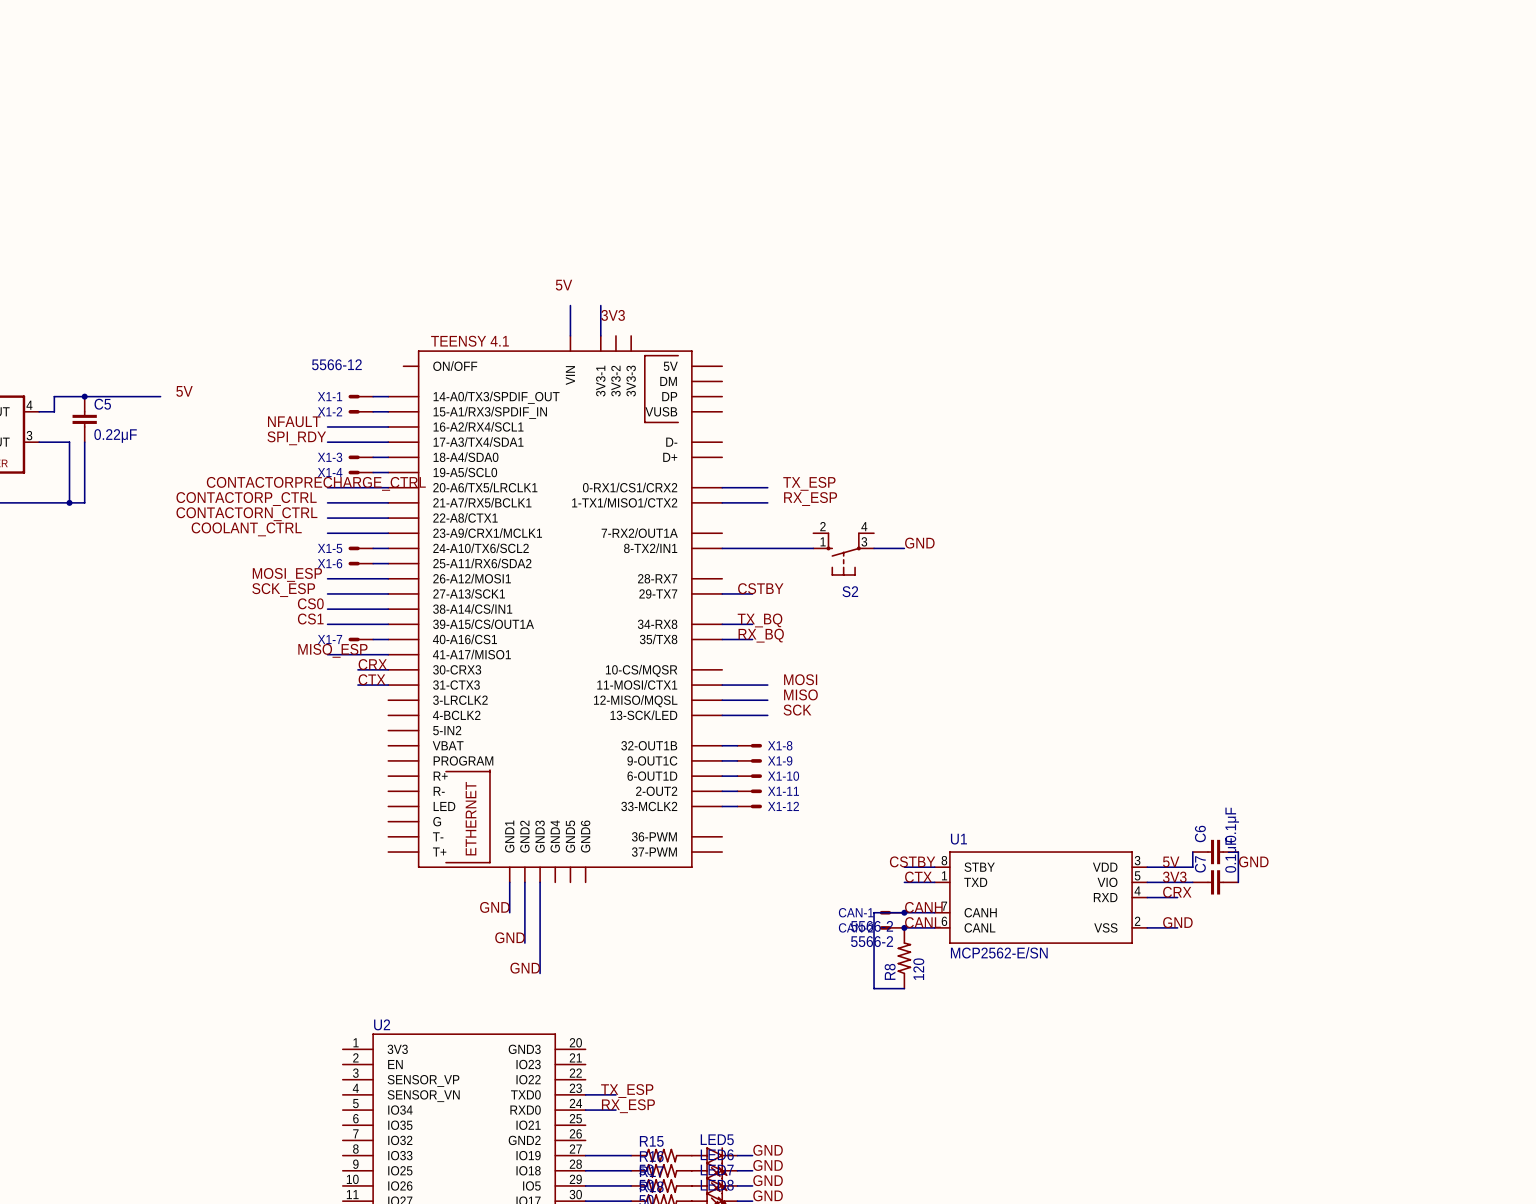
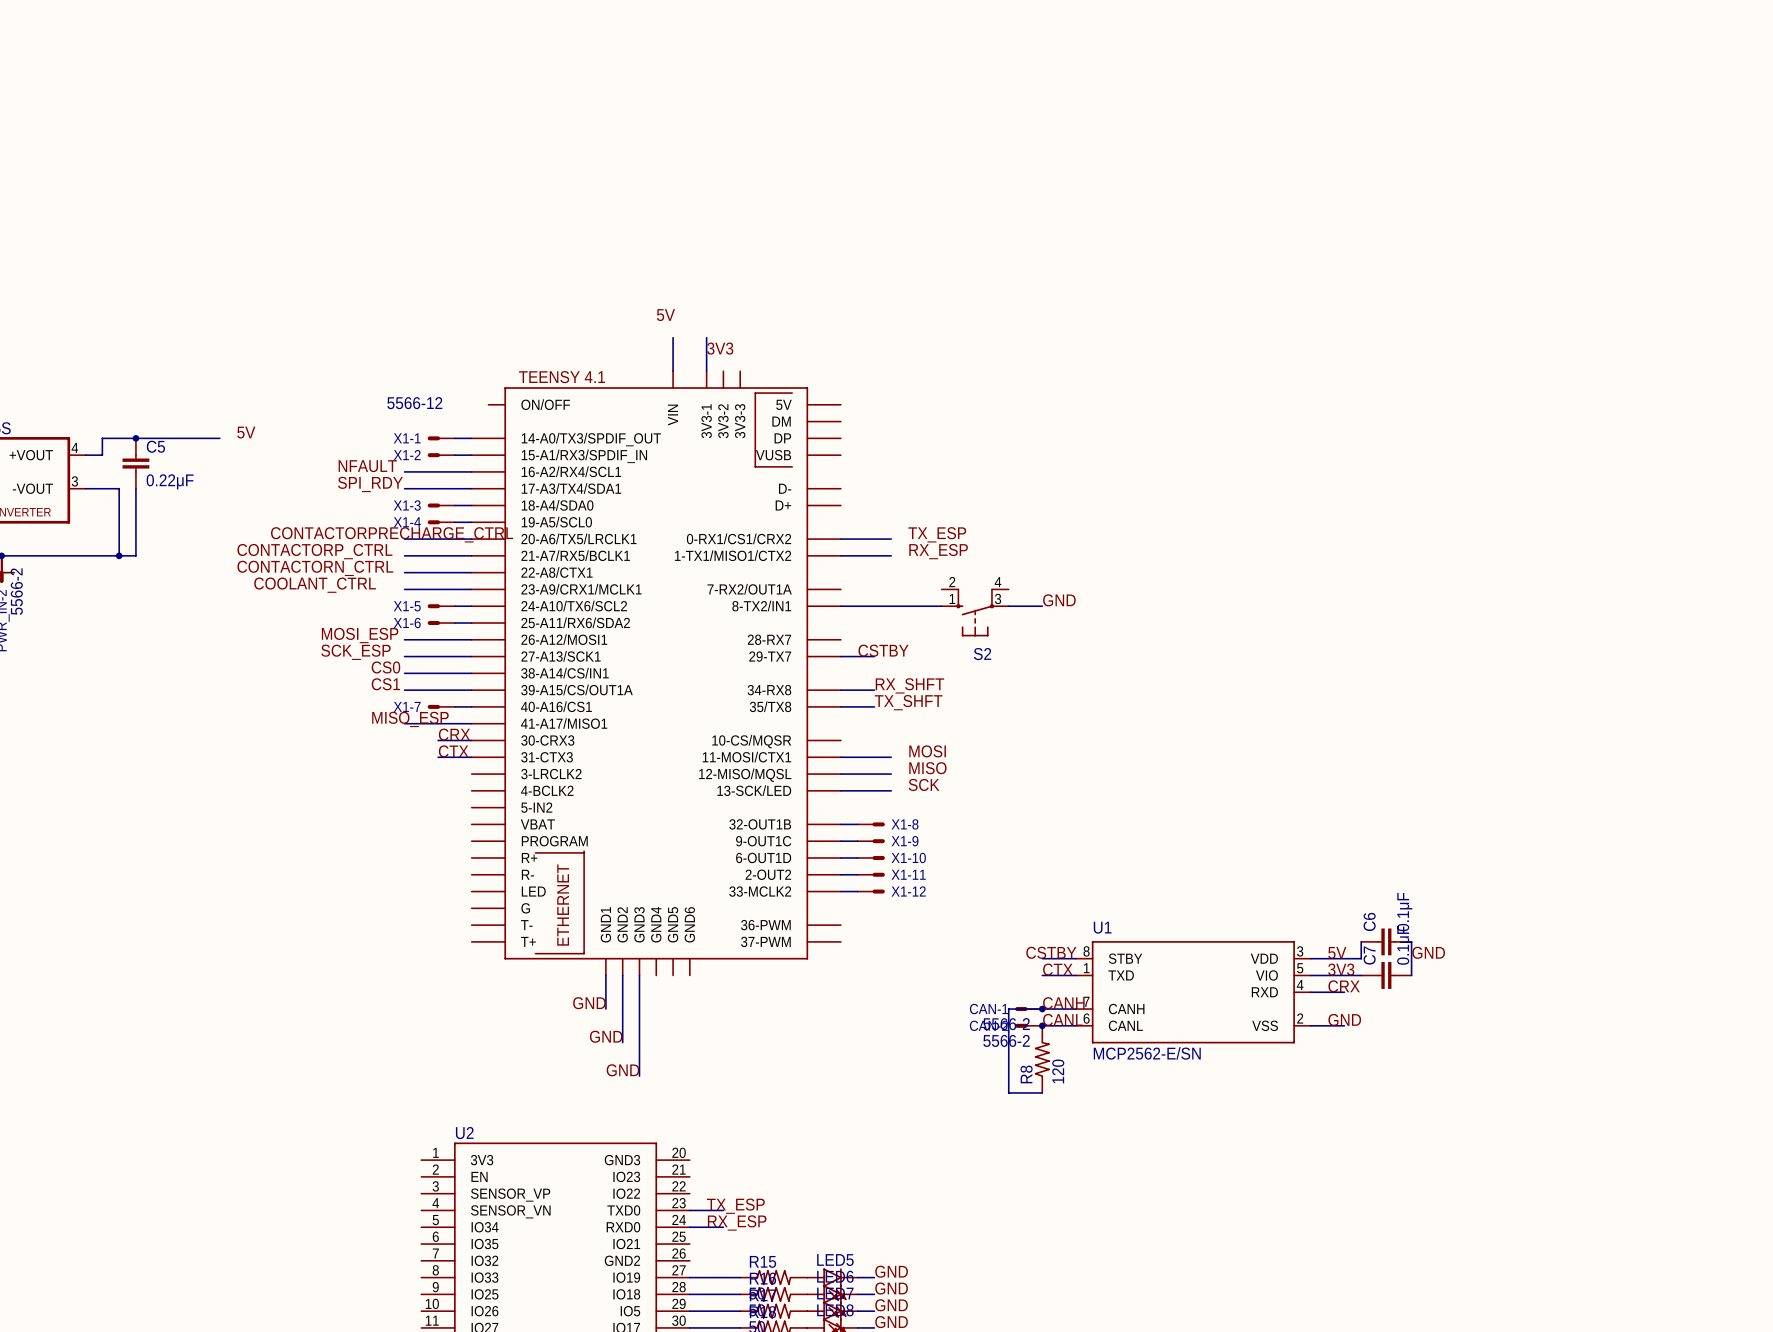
label: TX_BQ (760, 620) -> none
label: none -> RX_SHFT (909, 685)
label: RX_BQ (761, 635) -> none
label: none -> TX_SHFT (908, 702)

